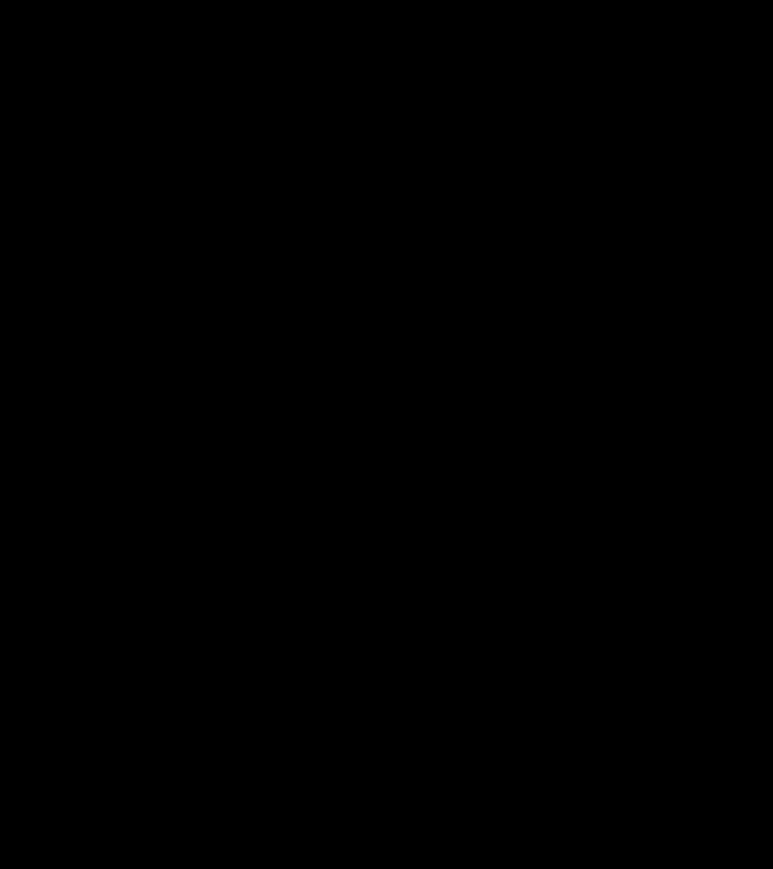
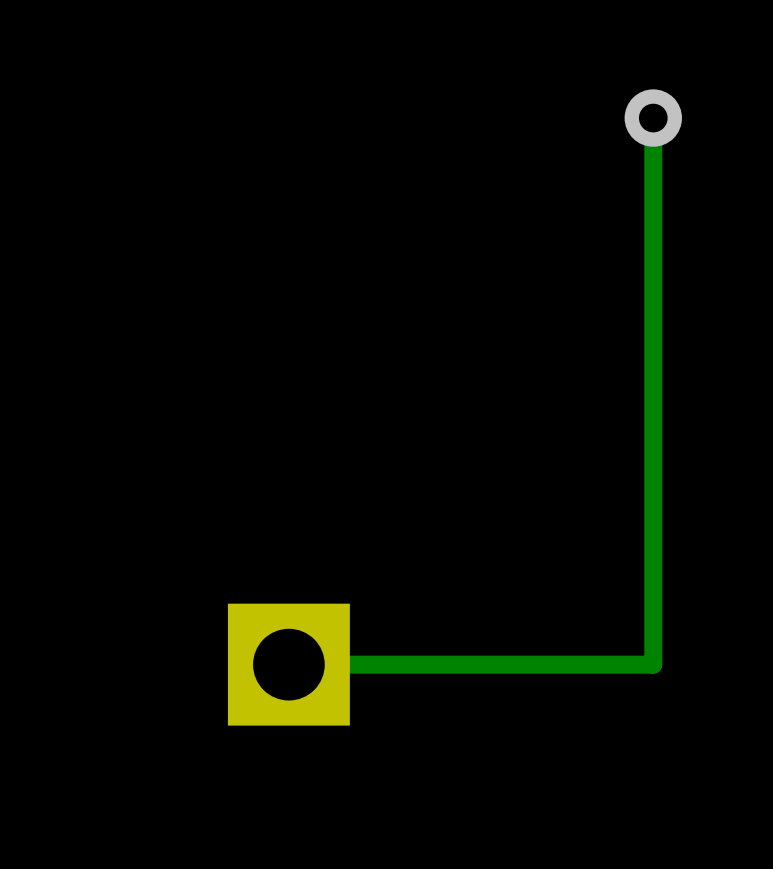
track: none -> (653, 118) (653, 664) (288, 664)
via: none -> (653, 118)
part: none -> (288, 664)

